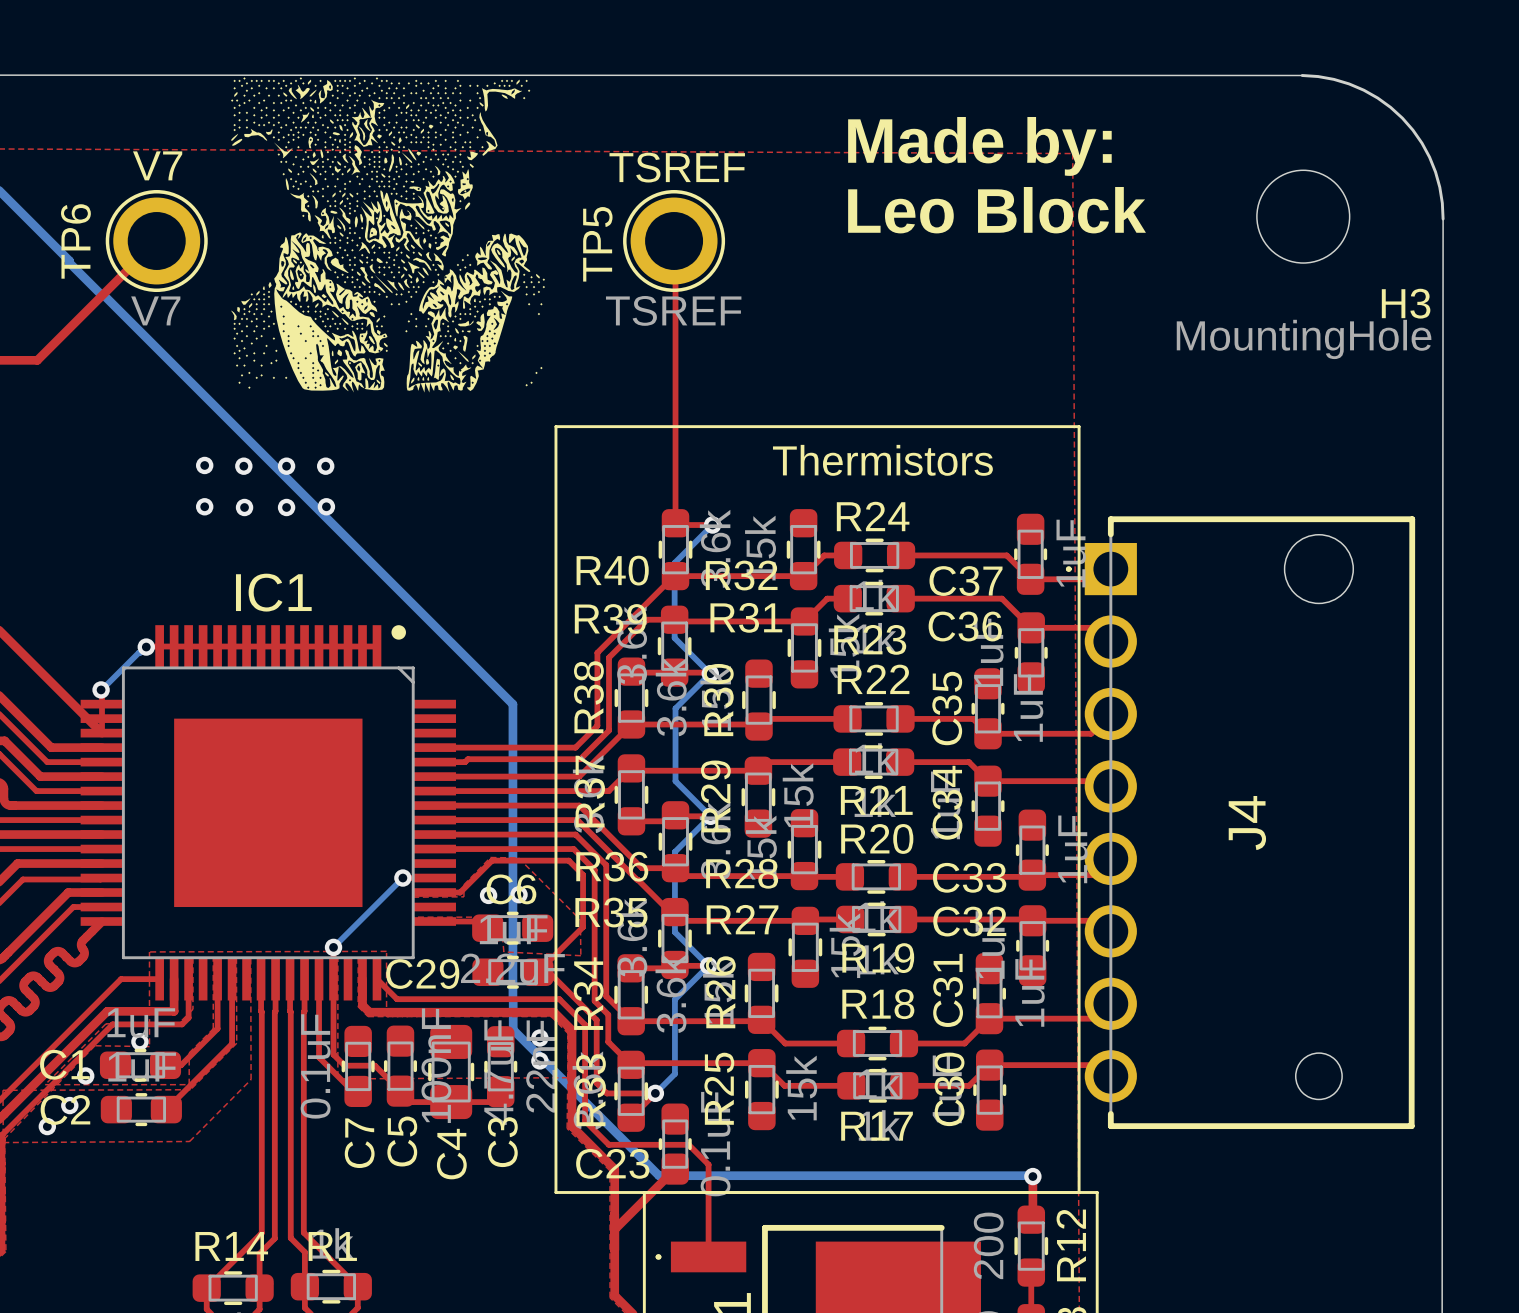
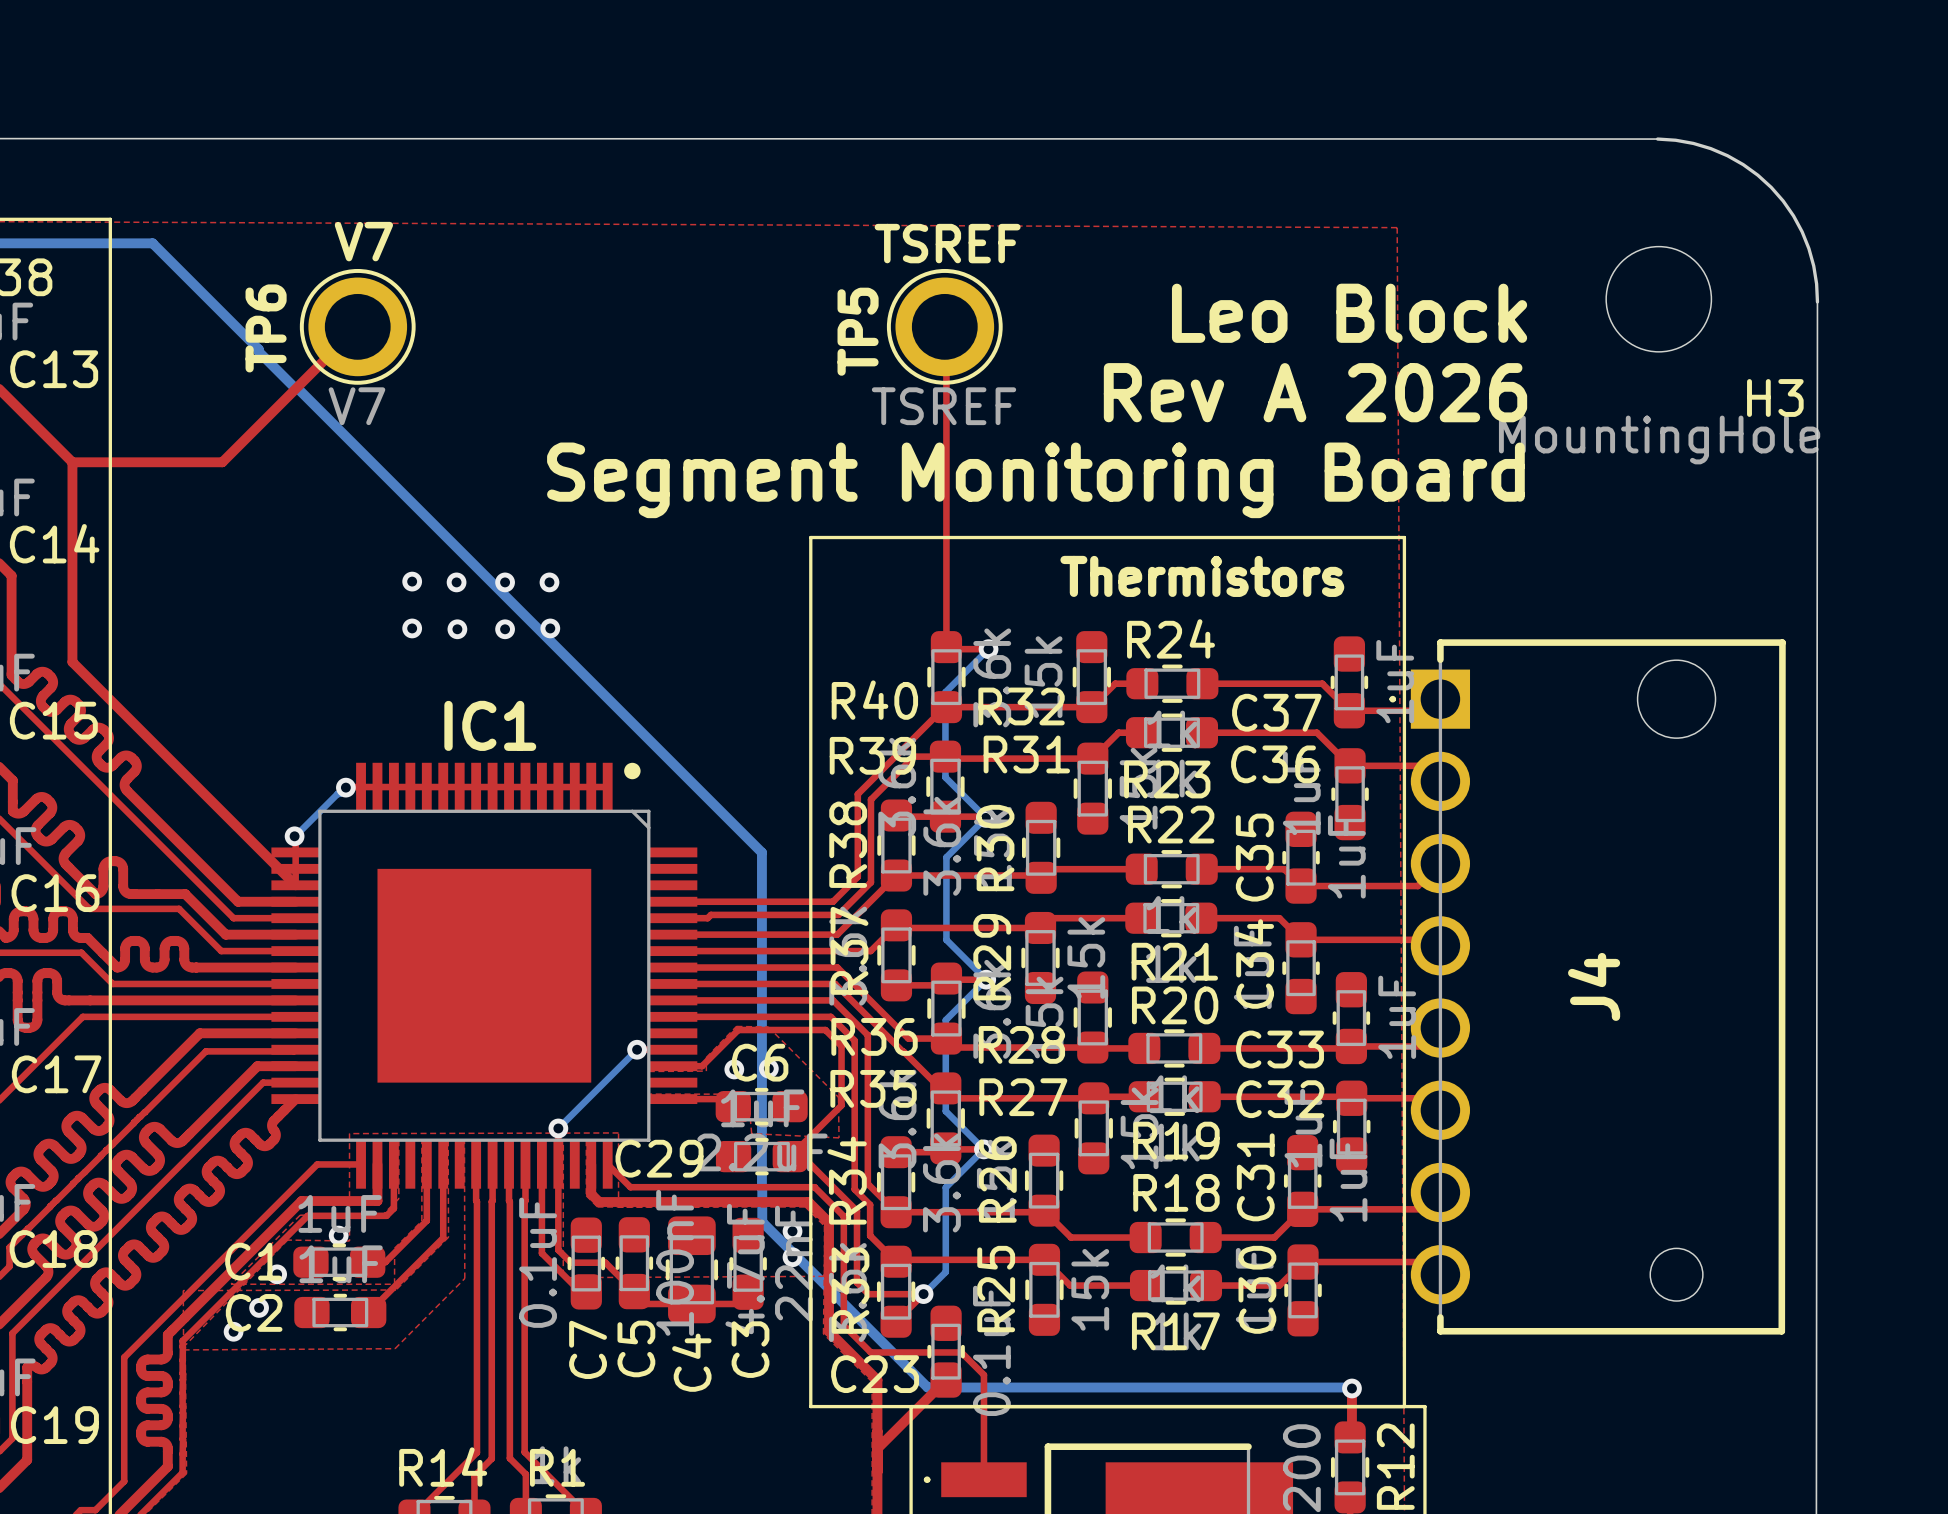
drawing: [230, 77, 546, 393] -> none
text: Made by: (979, 146) -> none
text position: Leo Block (997, 210) -> Leo Block (1349, 313)
text: none -> Rev A 2026 (1315, 392)
text: none -> Segment Monitoring Board (1035, 480)

